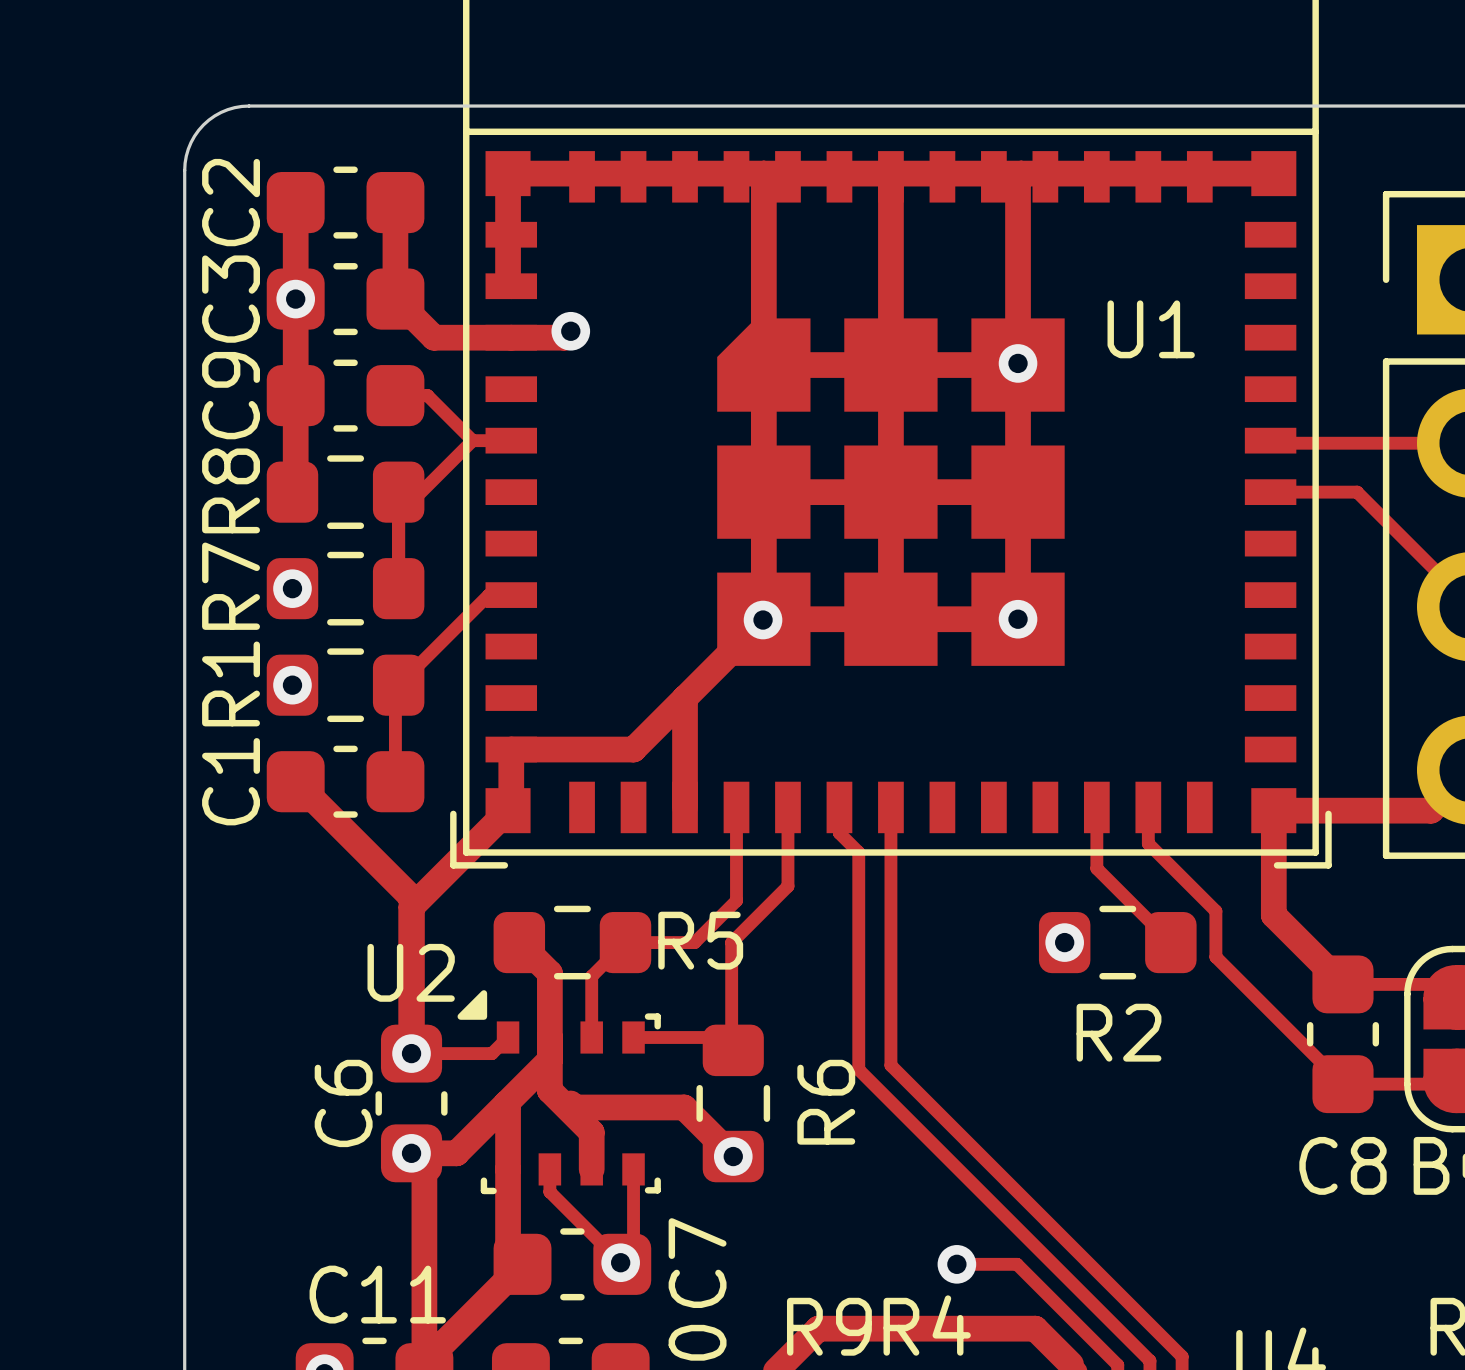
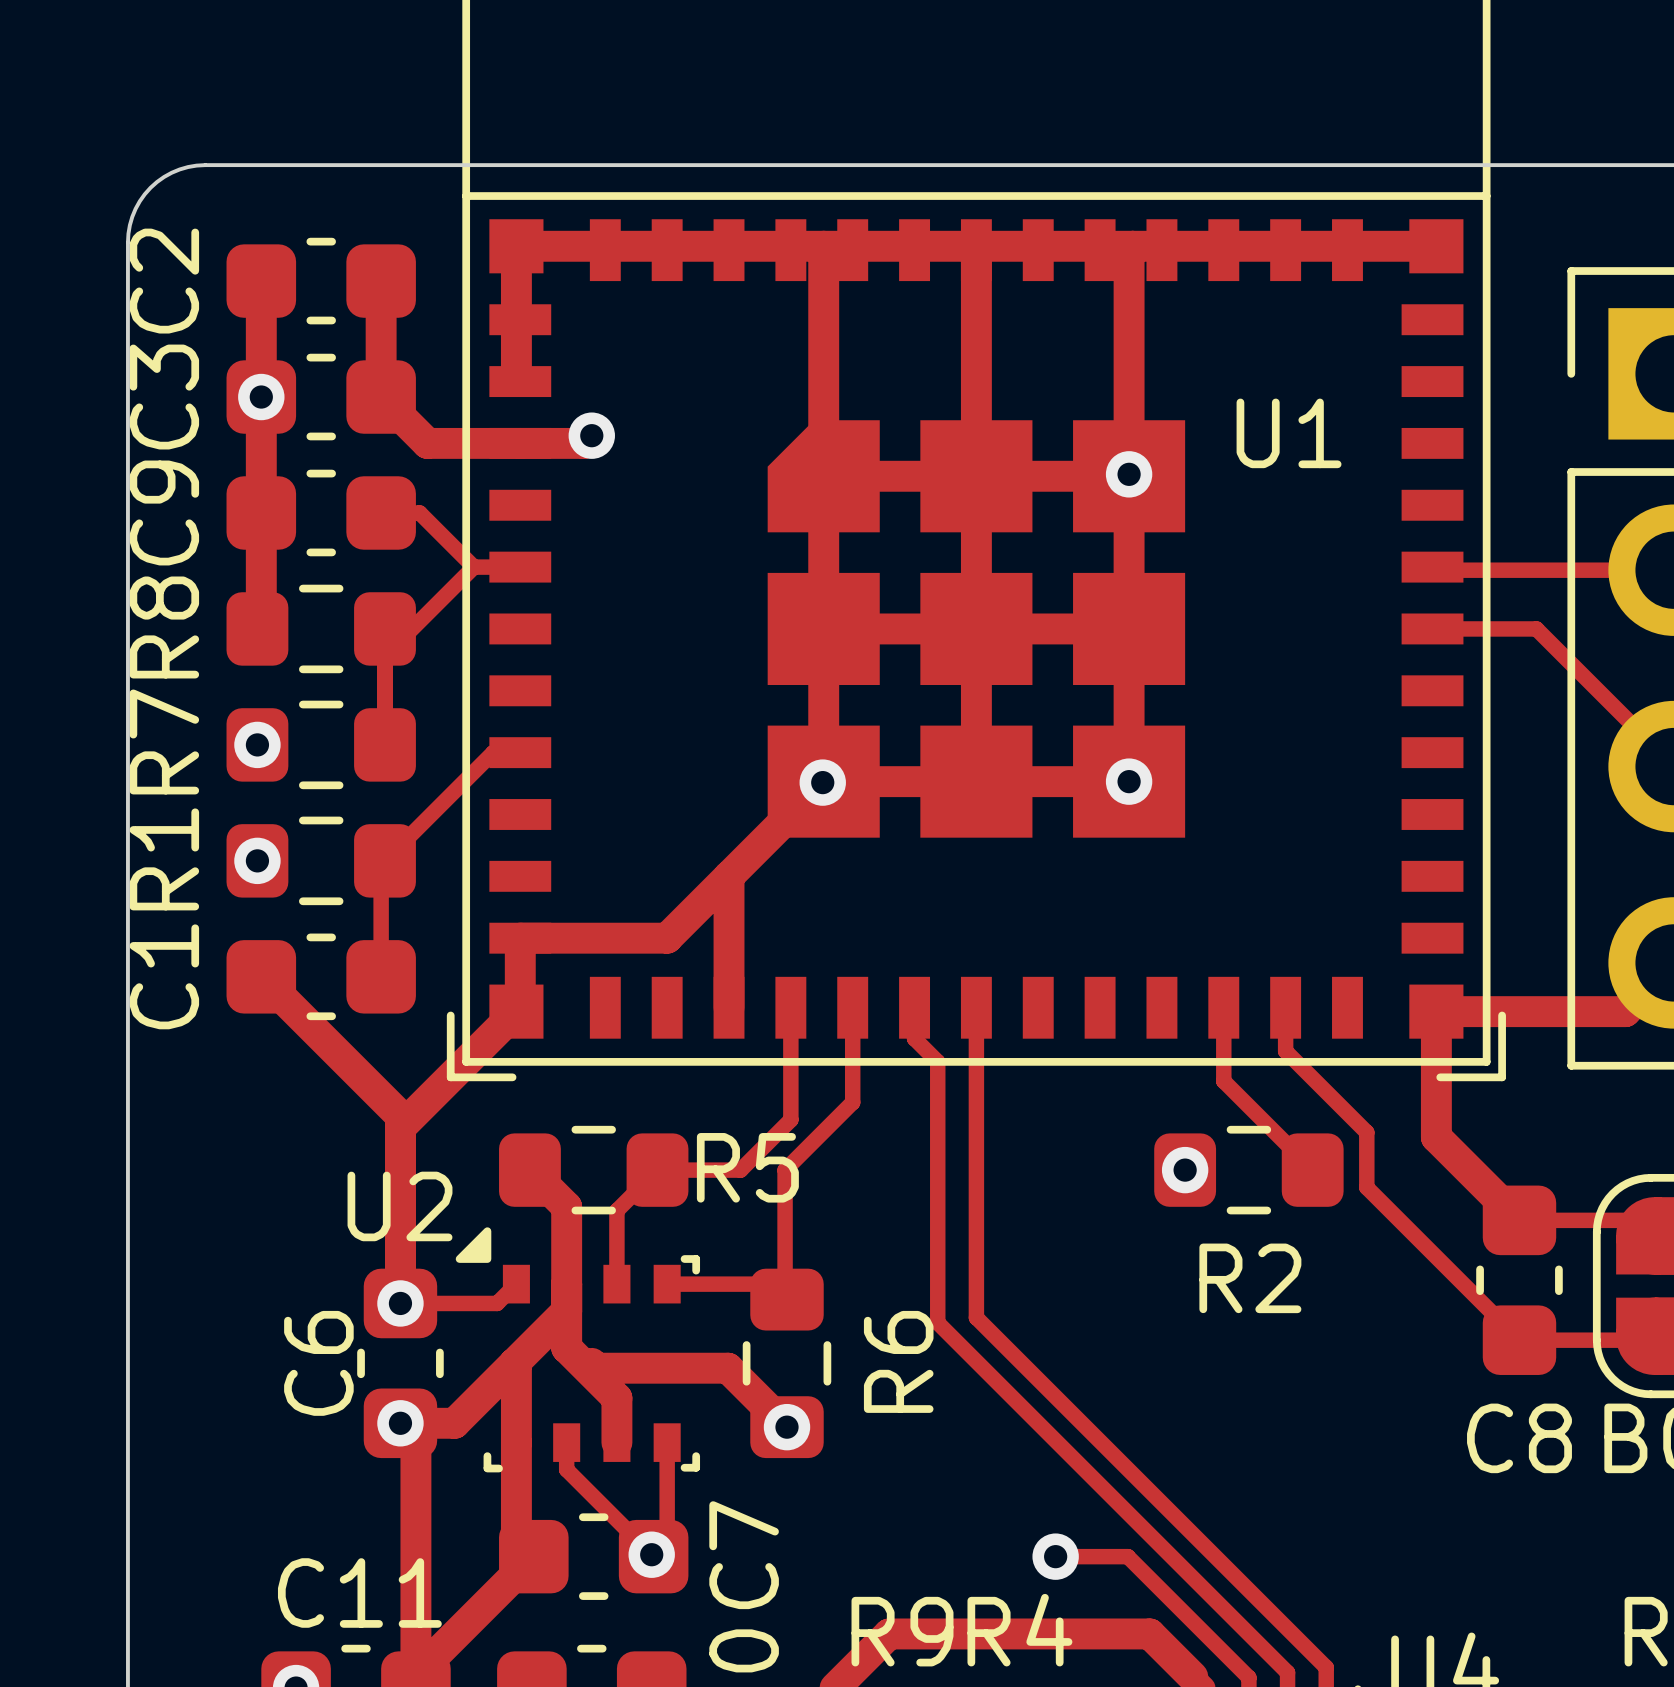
C2 name position: C2 (231, 202) -> C2 (164, 281)
C3 name position: C3 (231, 299) -> C3 (164, 397)
C9 name position: C9 (231, 395) -> C9 (164, 512)
R8 name position: R8 (231, 490) -> R8 (164, 627)
R7 name position: R7 (231, 586) -> R7 (164, 741)
R1 name position: R1 (231, 683) -> R1 (164, 859)
C1 name position: C1 (231, 781) -> C1 (164, 976)

